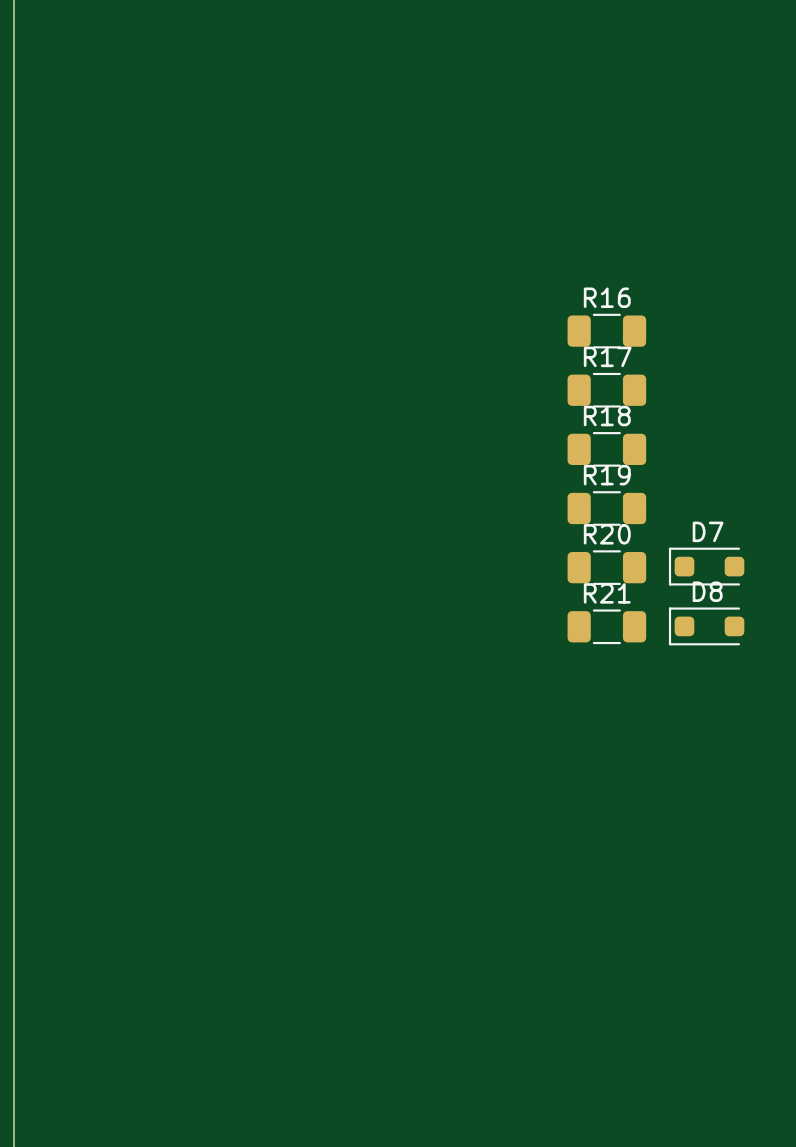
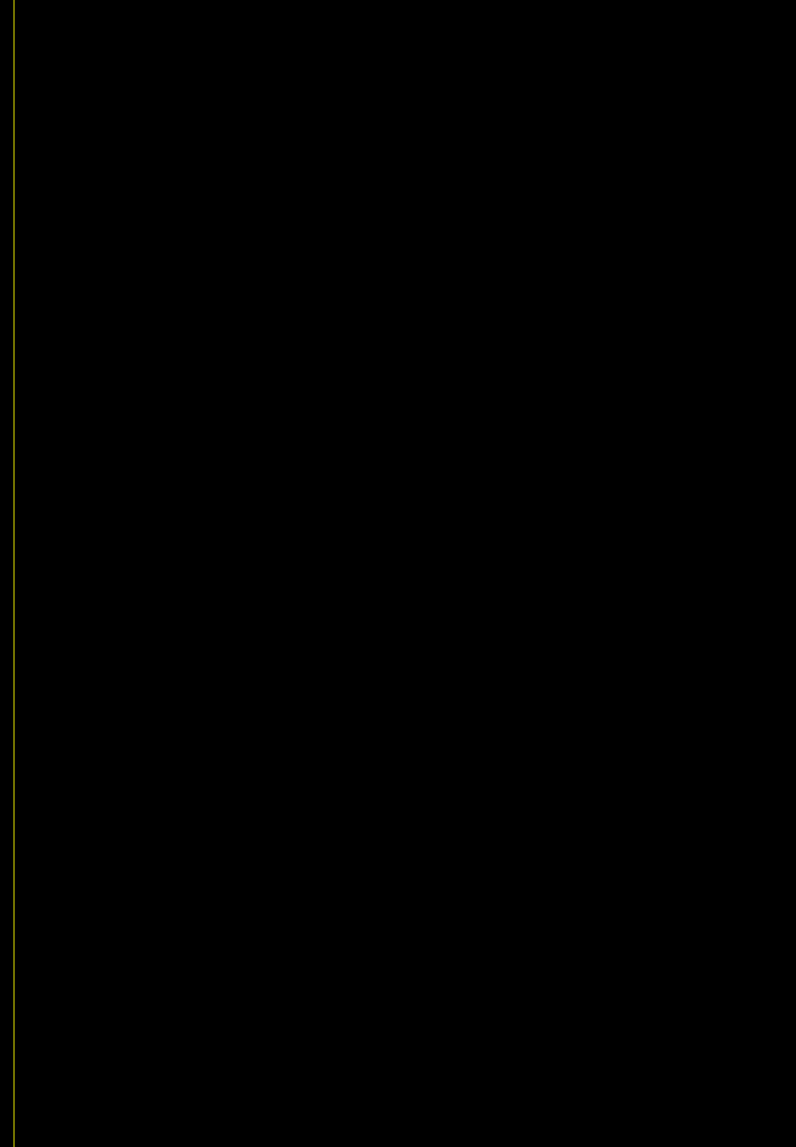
R16: (606, 331) -> none
R17: (606, 390) -> none
R18: (606, 449) -> none
R19: (606, 508) -> none
D7: (706, 566) -> none
R20: (606, 567) -> none
R21: (606, 626) -> none
D8: (706, 626) -> none

